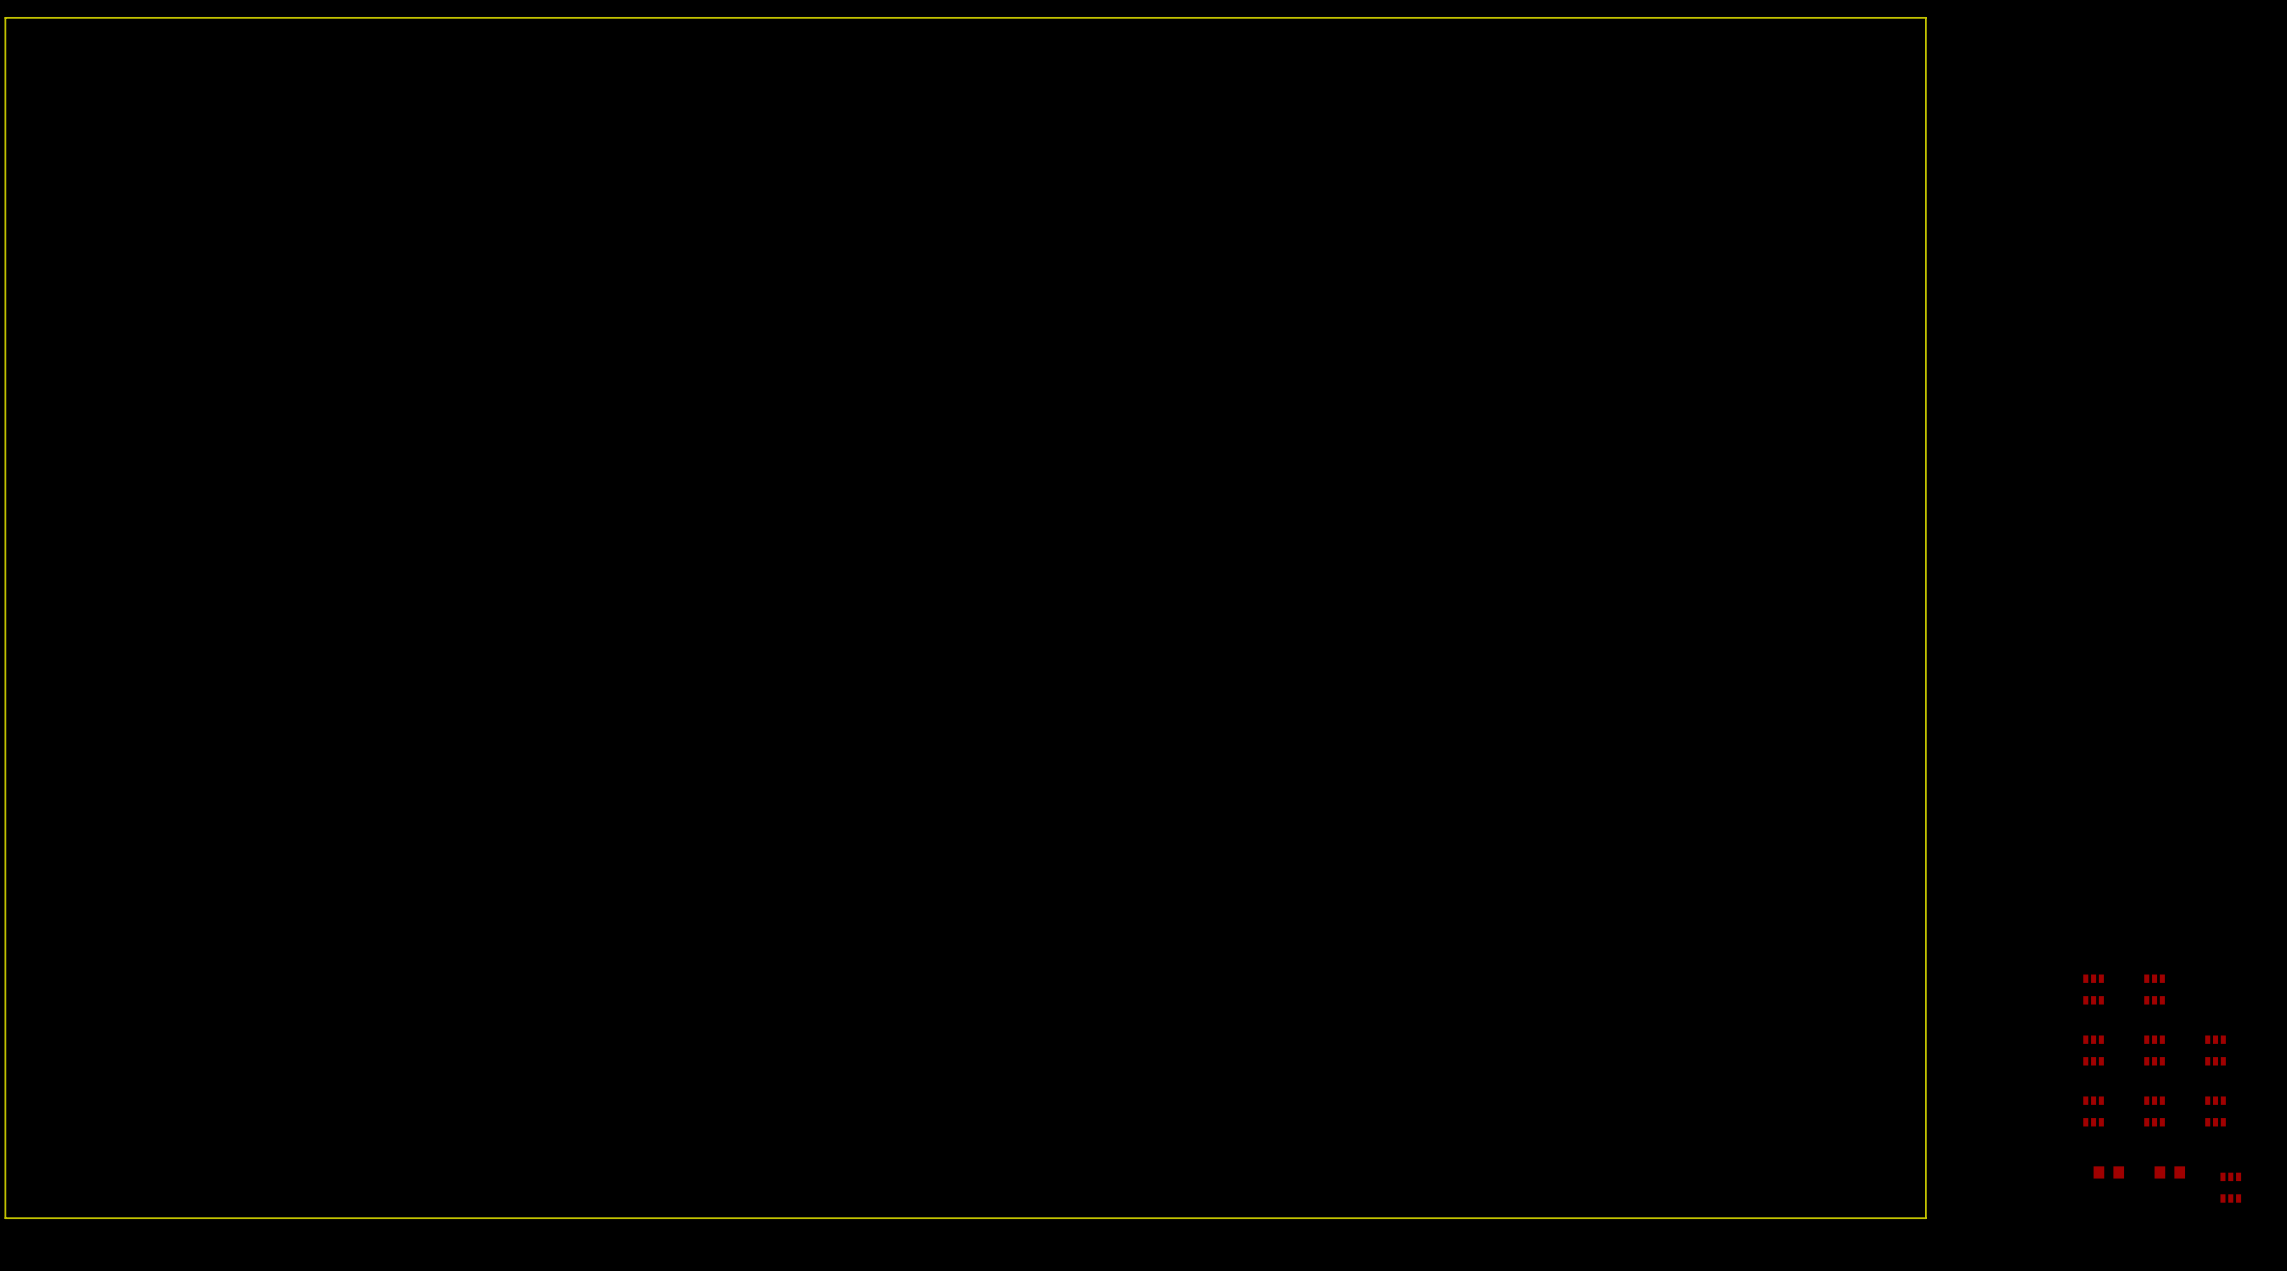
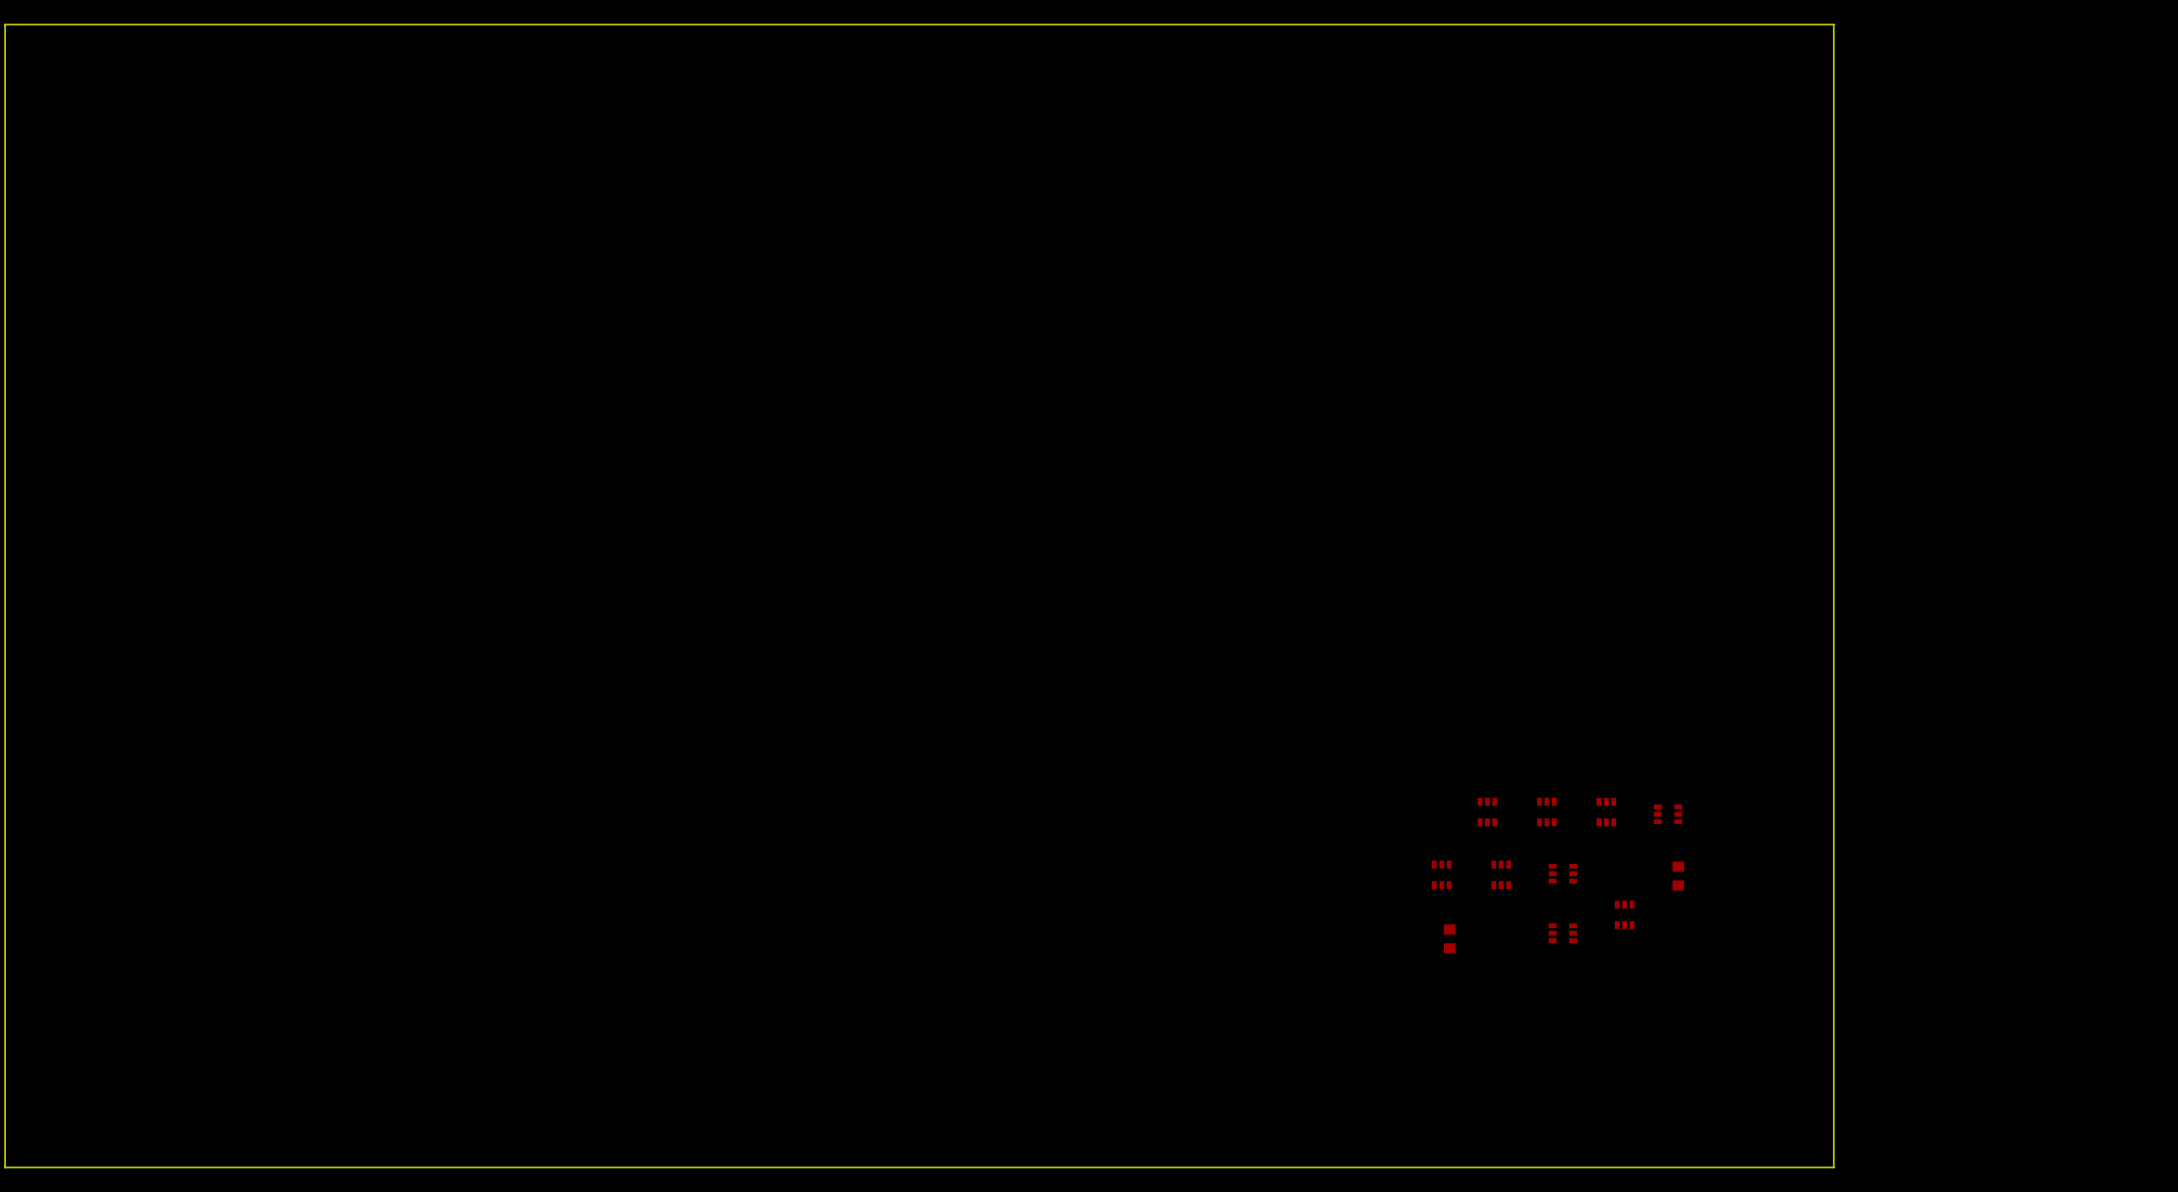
part: none -> (1487, 812)
part: none -> (1546, 812)
part: none -> (1606, 812)
part: none -> (1668, 814)
part: none -> (1562, 873)
part: none -> (1441, 874)
part: none -> (1501, 874)
part: none -> (1678, 876)
part: none -> (1624, 914)
part: none -> (1562, 933)
part: none -> (1449, 938)
part: (2093, 989) -> none
part: (2154, 989) -> none
part: (2093, 1050) -> none
part: (2154, 1050) -> none
part: (2215, 1050) -> none
part: (2093, 1111) -> none
part: (2154, 1111) -> none
part: (2215, 1111) -> none
part: (2108, 1172) -> none
part: (2169, 1172) -> none
part: (2230, 1187) -> none

